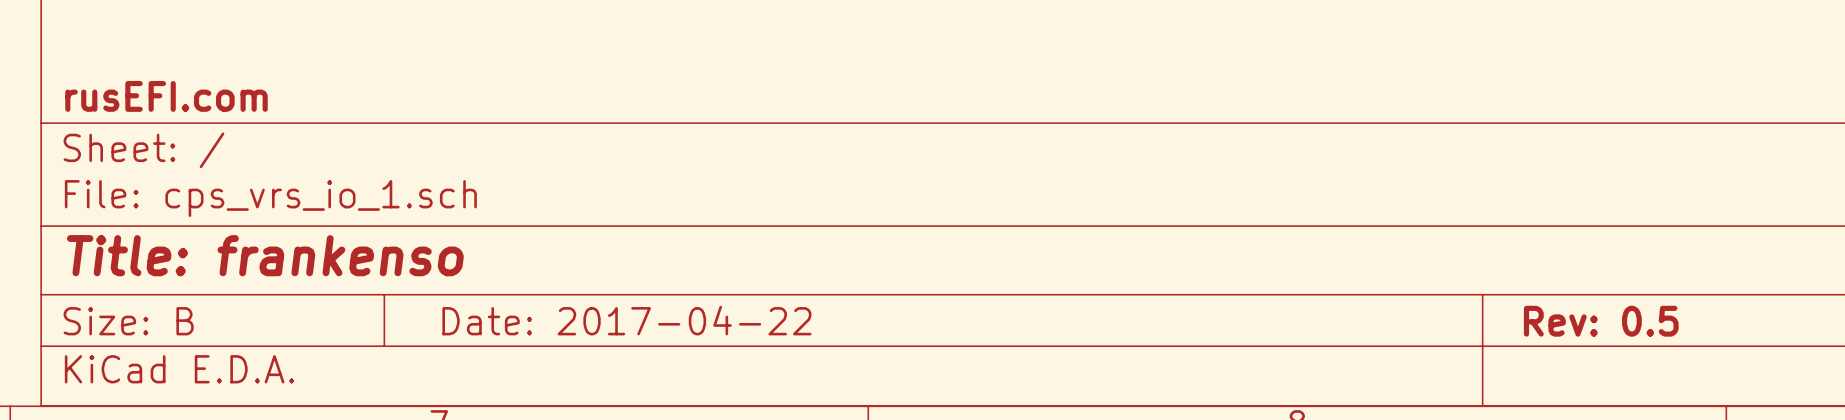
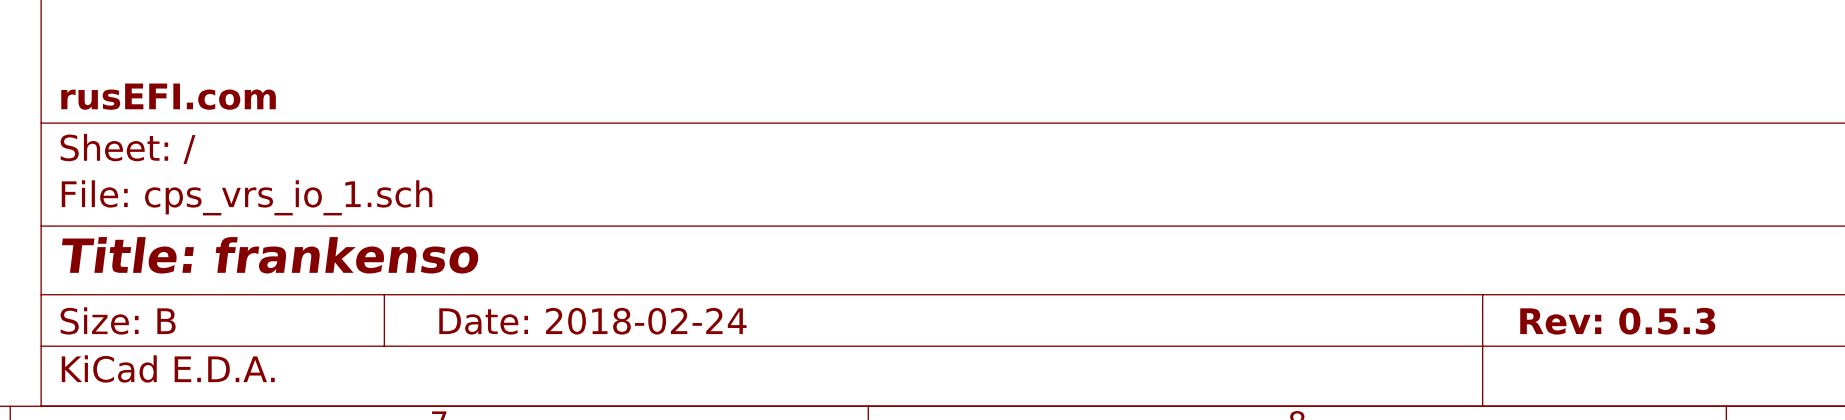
title block: Date: 2017-04-22 (626, 320) -> Date: 2018-02-24 (592, 321)
title block: Rev: 0.5 (1601, 321) -> Rev: 0.5.3 (1617, 321)

